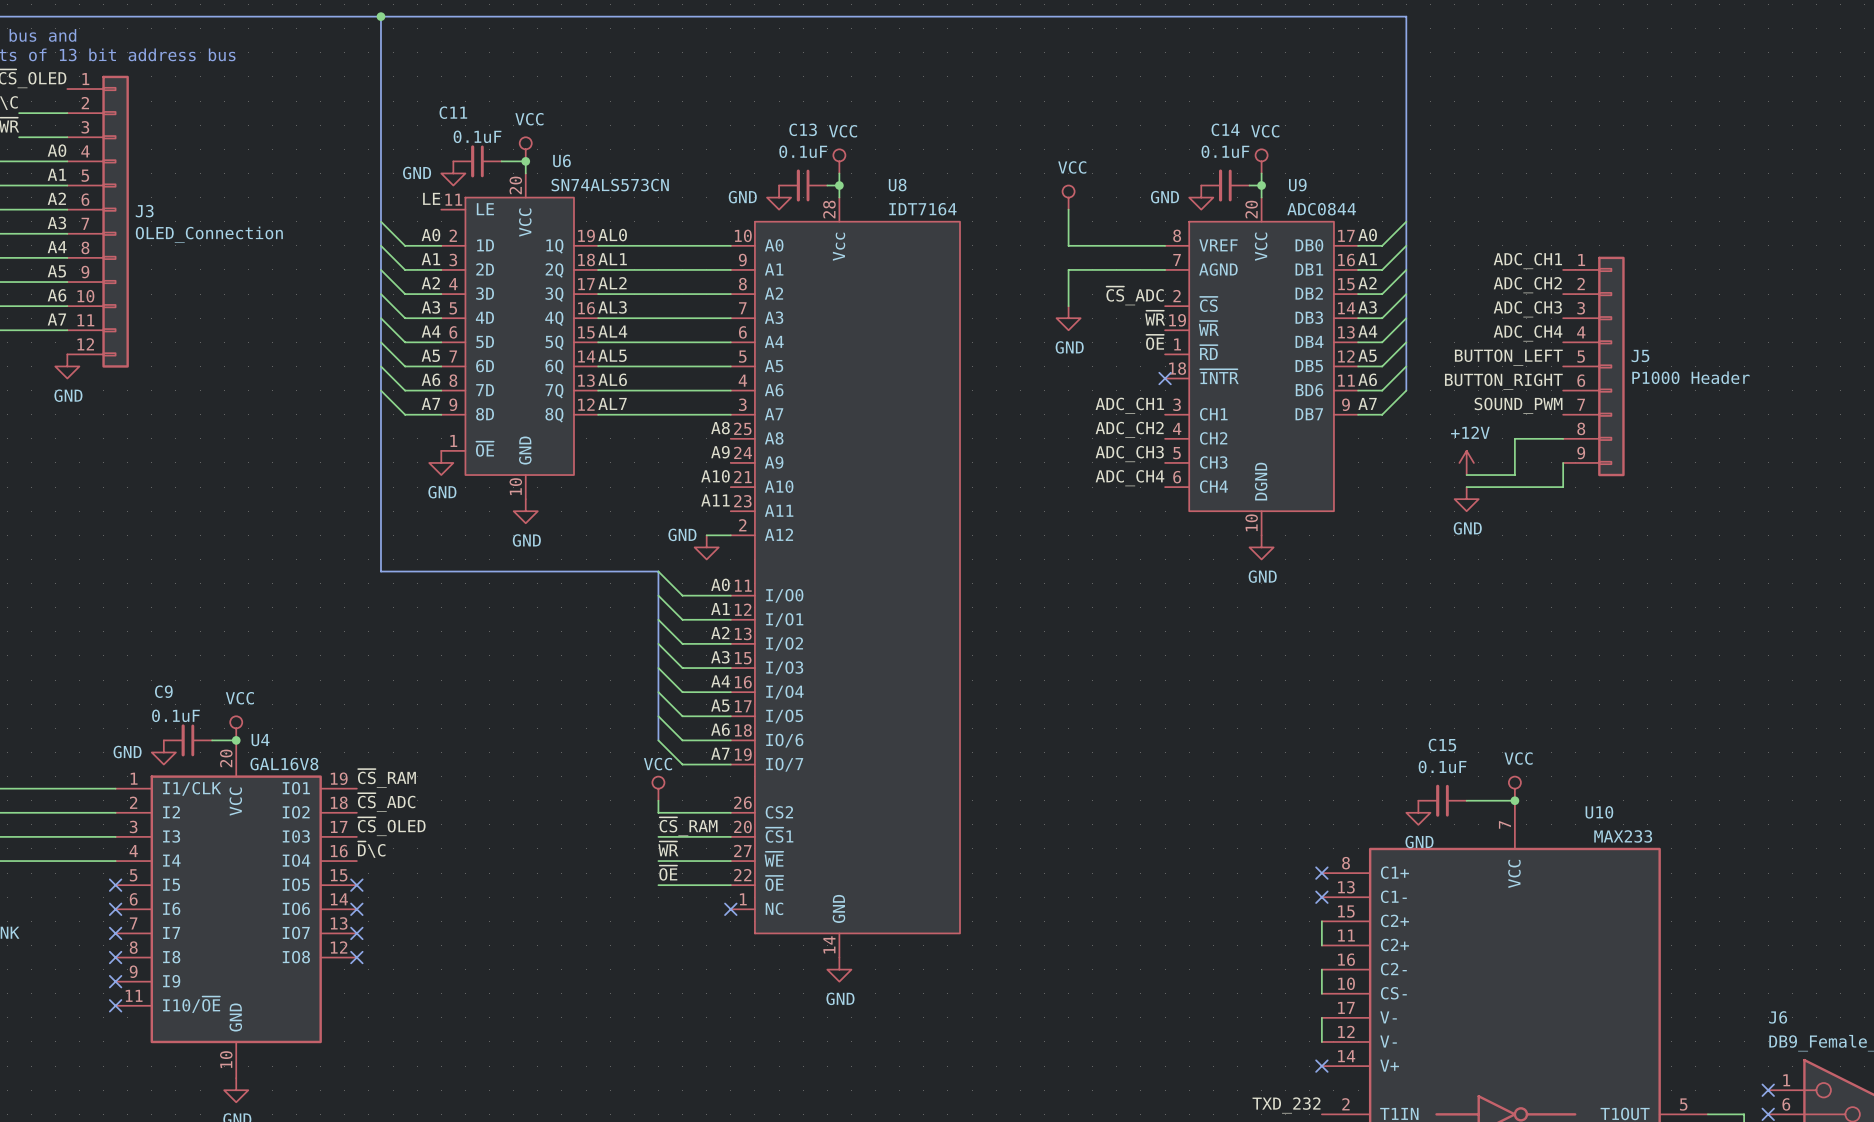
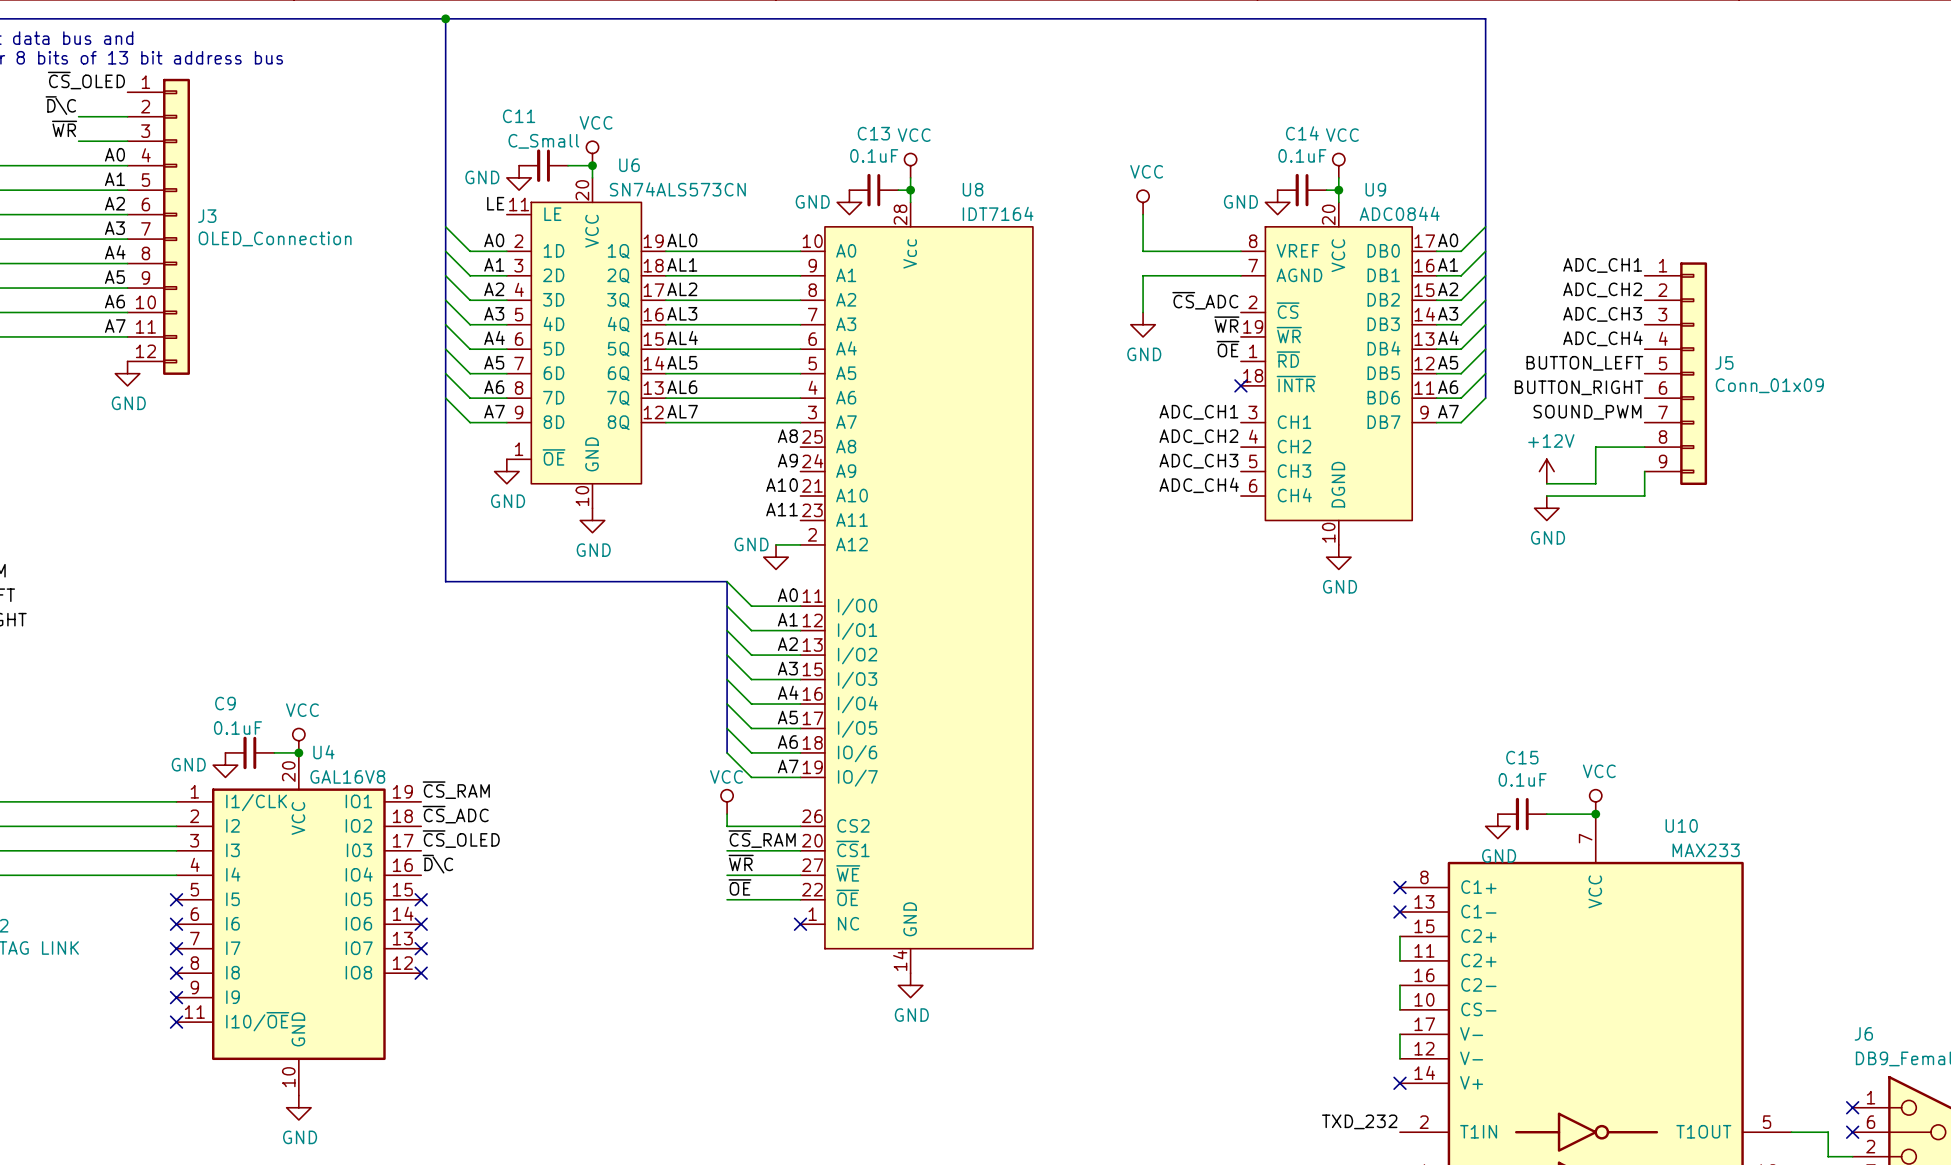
C11 value: 0.1uF (477, 136) -> C_Small (543, 141)
J5 value: P1000 Header (1690, 377) -> Conn_01x09 (1769, 385)

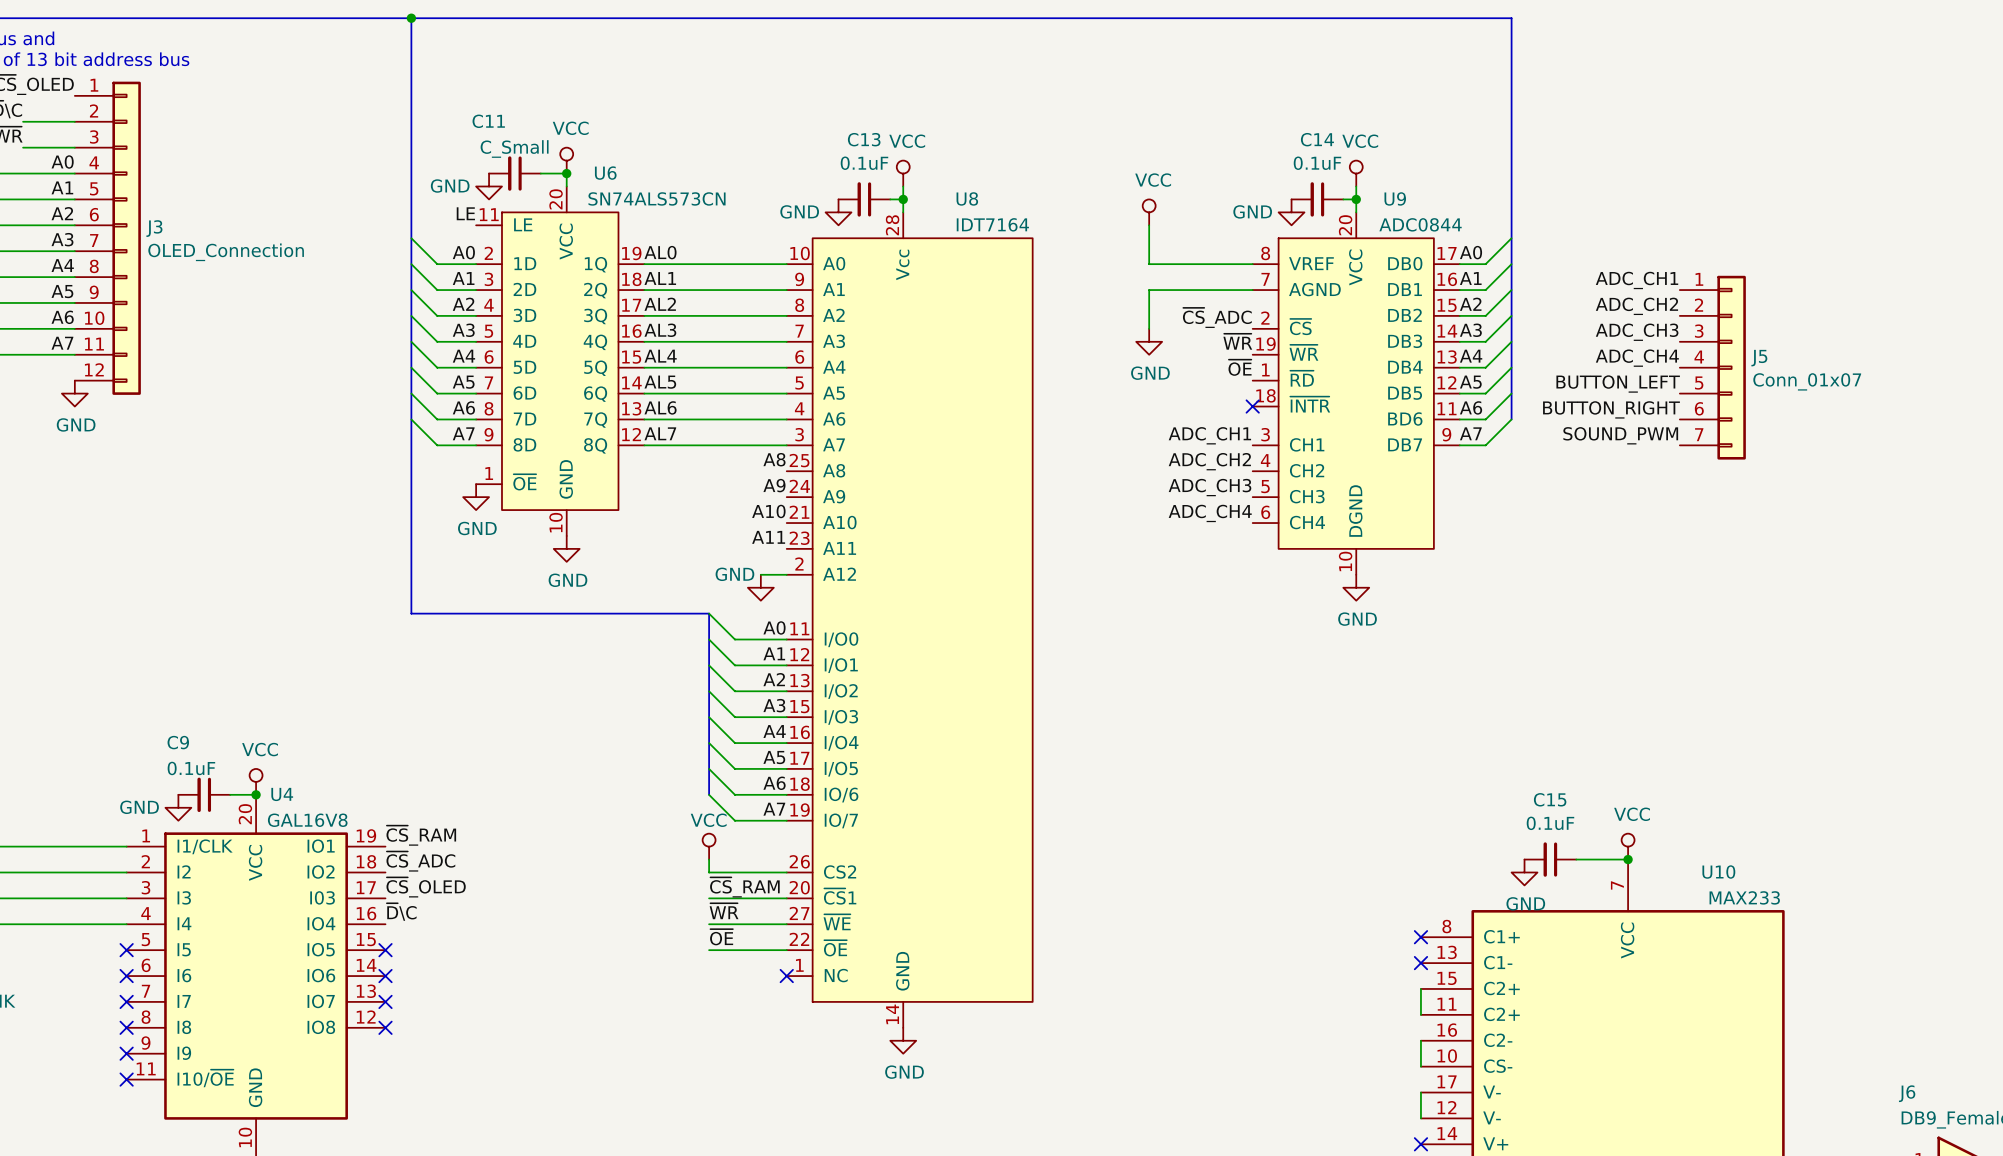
J5 symbol: [1644, 262, 1708, 486] -> [1679, 275, 1746, 460]
J5 value: Conn_01x09 (1769, 385) -> Conn_01x07 (1807, 381)
wire: (1644, 447) (1595, 447) (1595, 483) (1546, 483) -> none
power symbol: +12V (1546, 471) -> none
wire: (1644, 471) (1644, 496) (1546, 496) -> none
power symbol: GND (1546, 508) -> none

